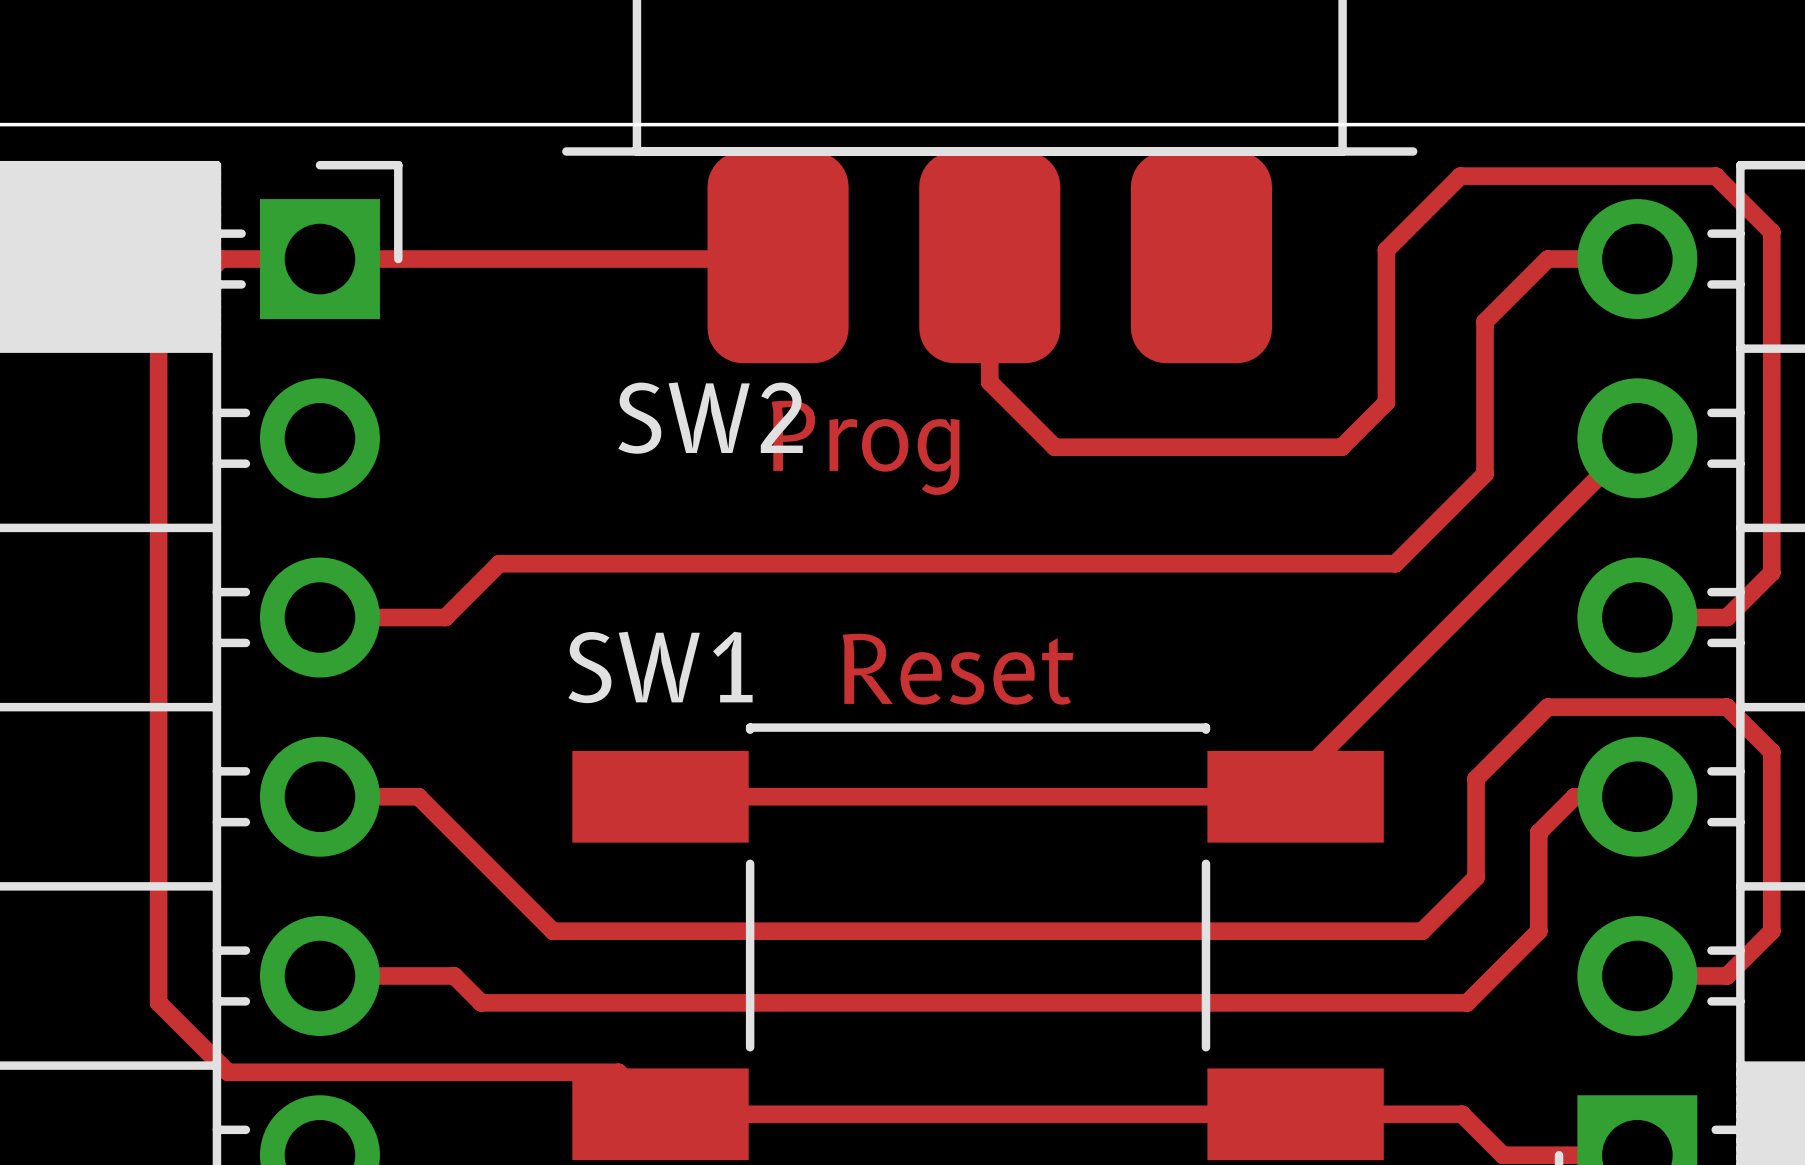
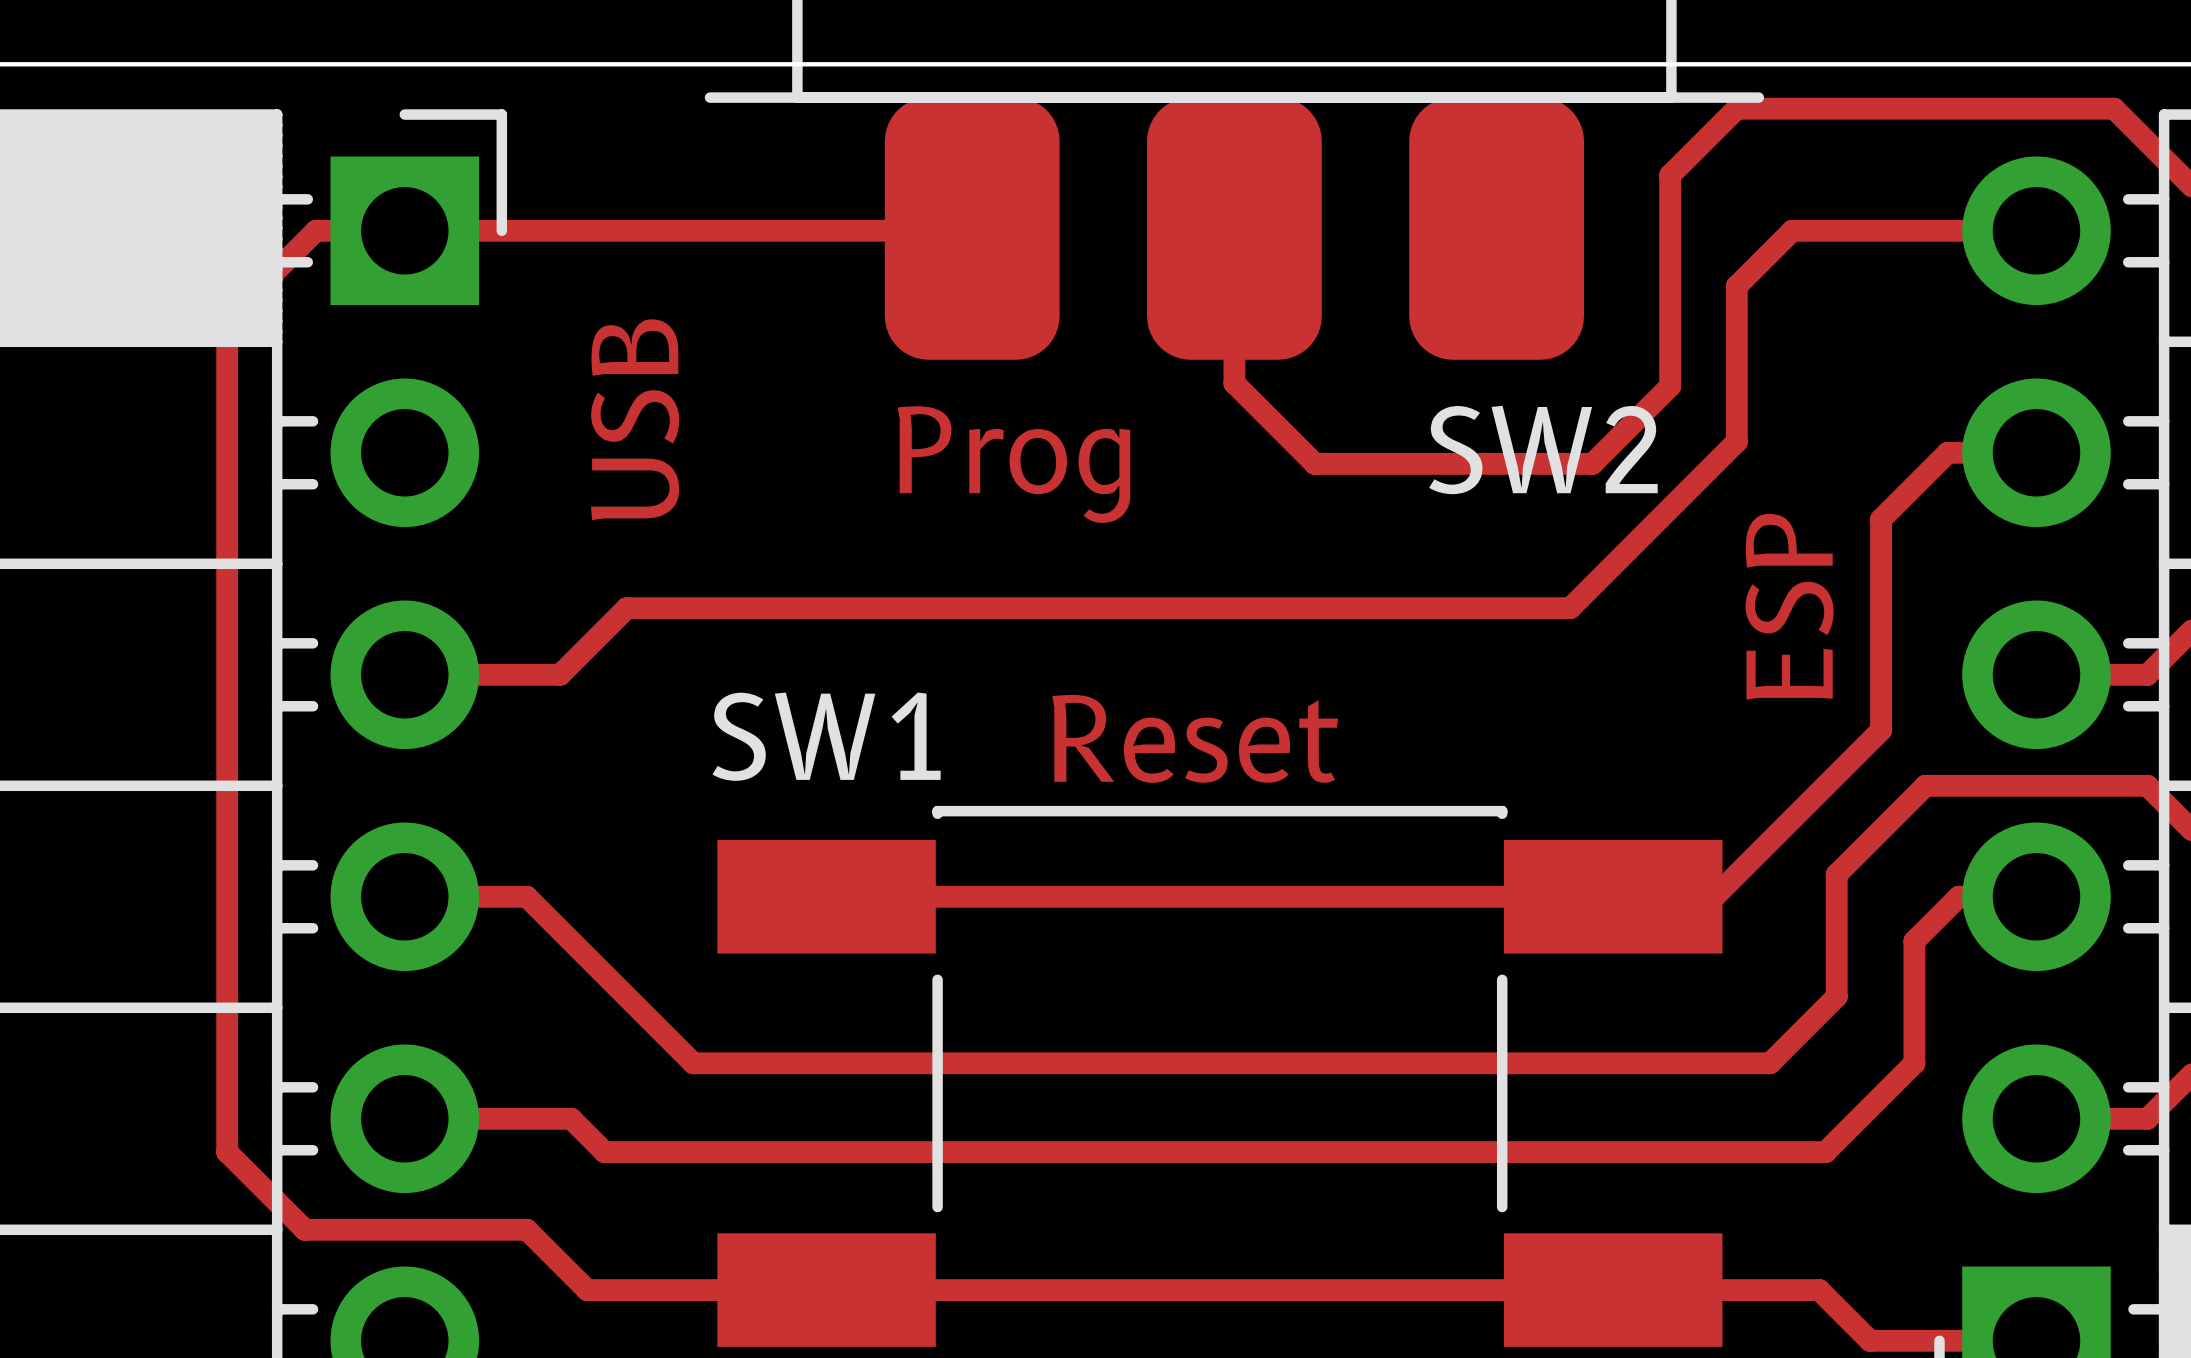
top track: (1715, 176) (1460, 176) (1386, 250) (1386, 402) (1341, 447) (1278, 447) -> (2133, 128) (2114, 108) (1736, 108) (1670, 175) (1670, 386) (1592, 463)
top track: (248, 259) (221, 259) (158, 321) (158, 1002) (228, 1072) (618, 1072) (660, 1114) -> (315, 230) (227, 319) (227, 1152) (304, 1229) (526, 1229) (587, 1290) (826, 1290)
top track: (1547, 259) (1485, 321) (1485, 474) (1395, 563) (1260, 563) -> (1925, 230) (1792, 230) (1736, 286) (1736, 441) (1570, 608)
text: none -> USB (635, 419)
SW2 name position: SW2 (710, 418) -> SW2 (1543, 450)
top track: (1637, 438) (1295, 780) (1295, 796) -> (2036, 452) (1947, 452) (1881, 519) (1881, 730) (1714, 896) (1613, 896)
text position: Prog (865, 447) -> Prog (1013, 464)
text: none -> ESP (1789, 606)

